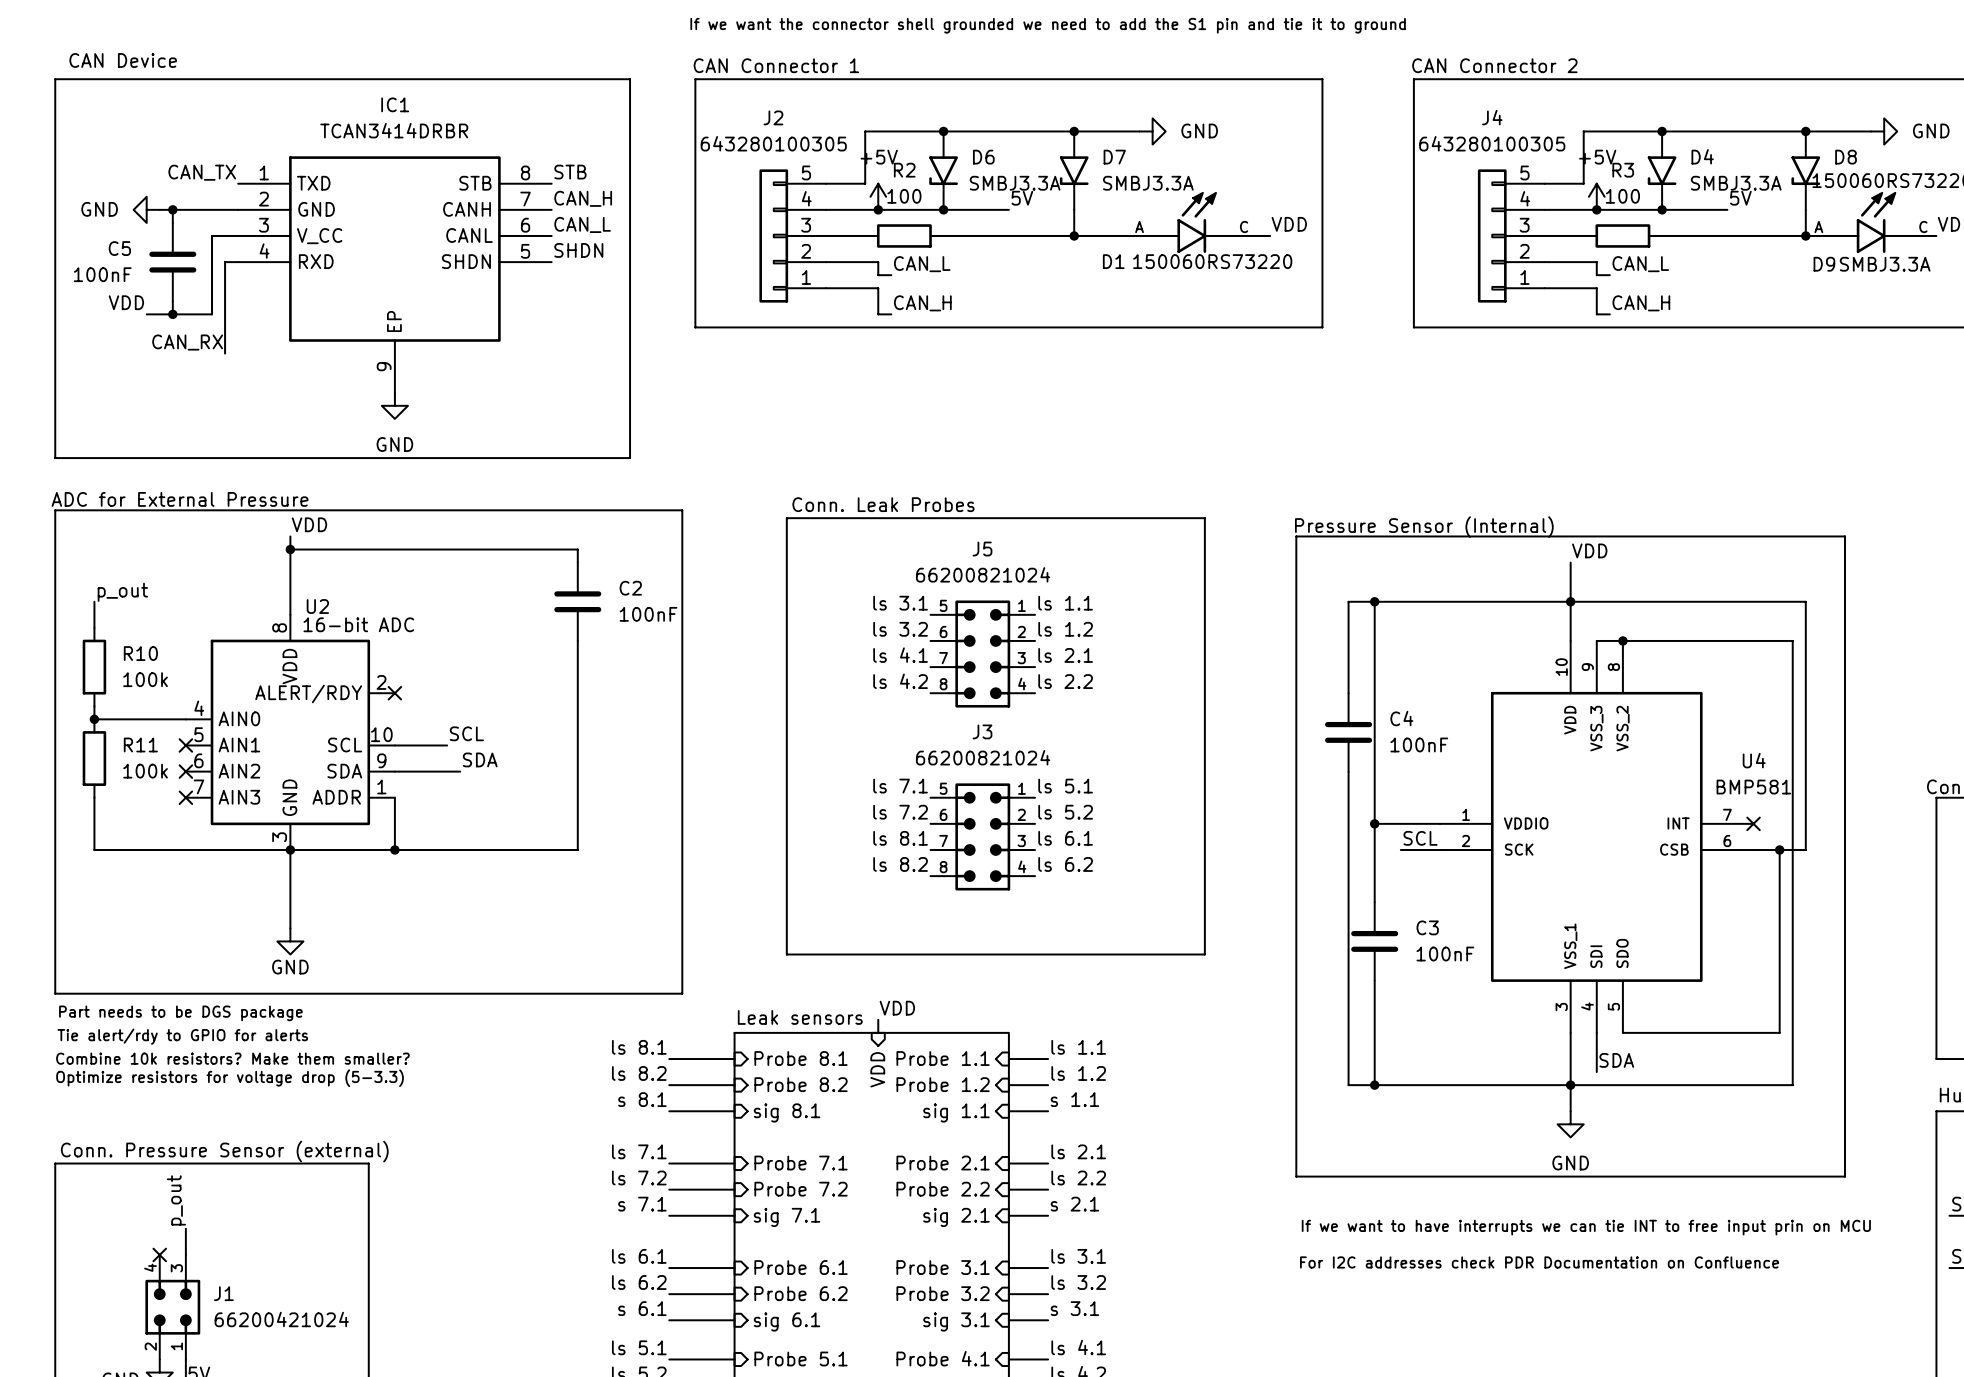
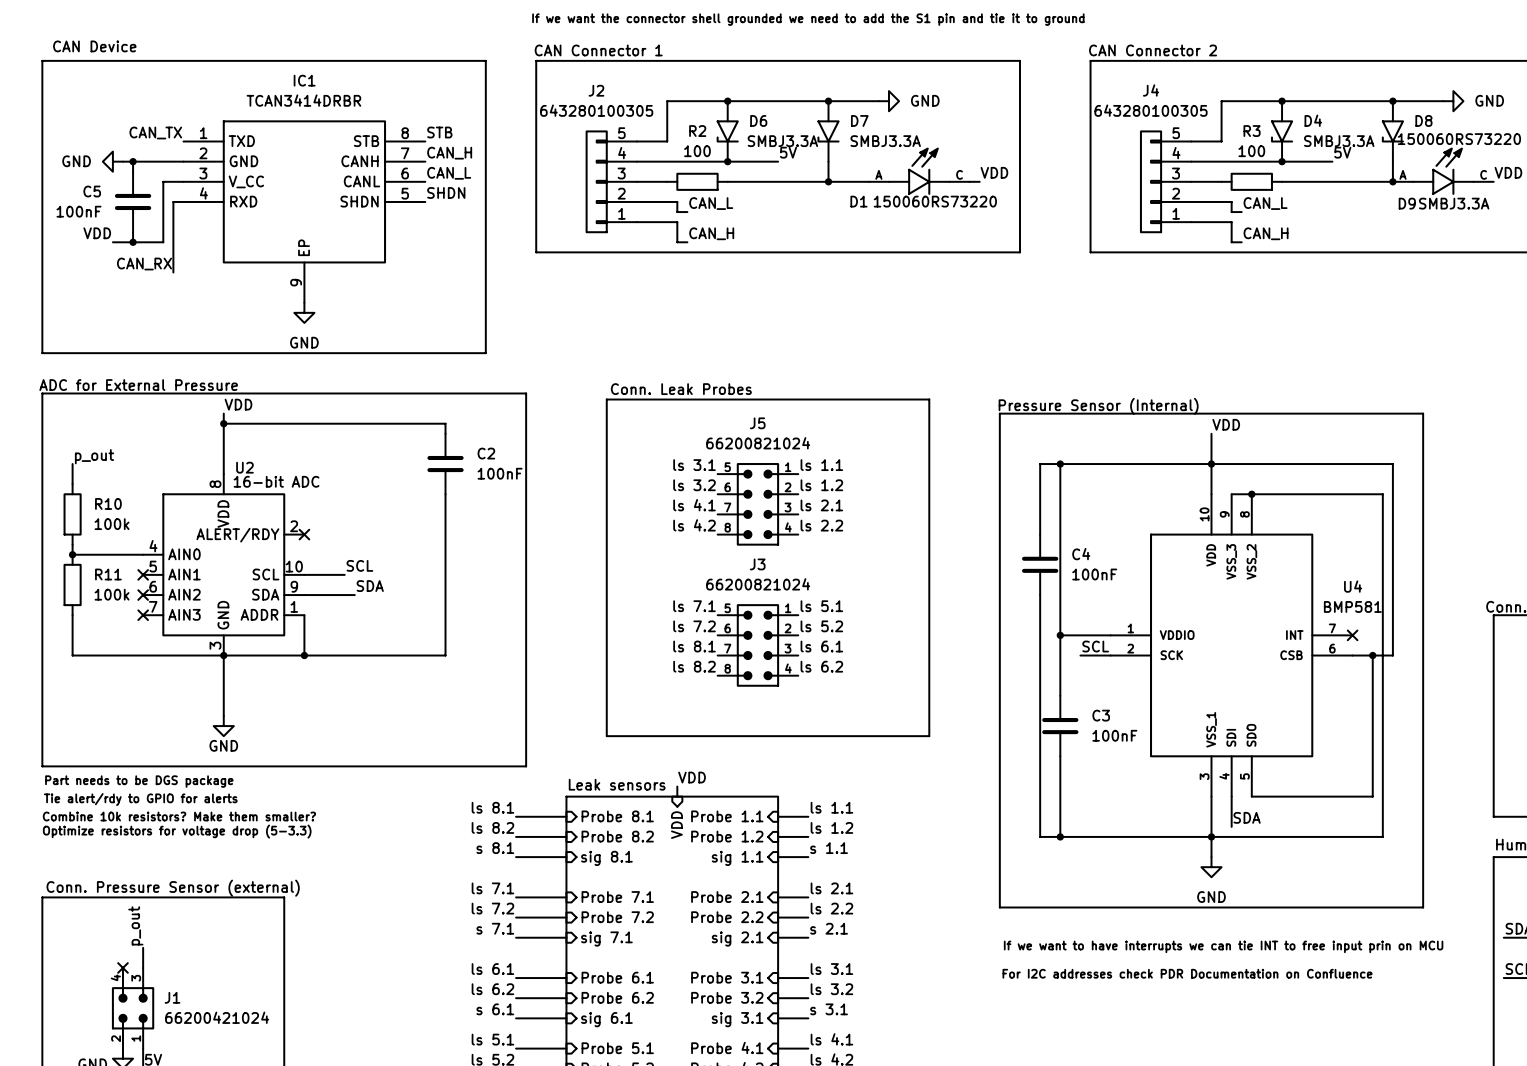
power symbol: +5V (878, 196) -> none
power symbol: +5V (1596, 196) -> none
junction: (878, 209) -> none
junction: (1596, 209) -> none

